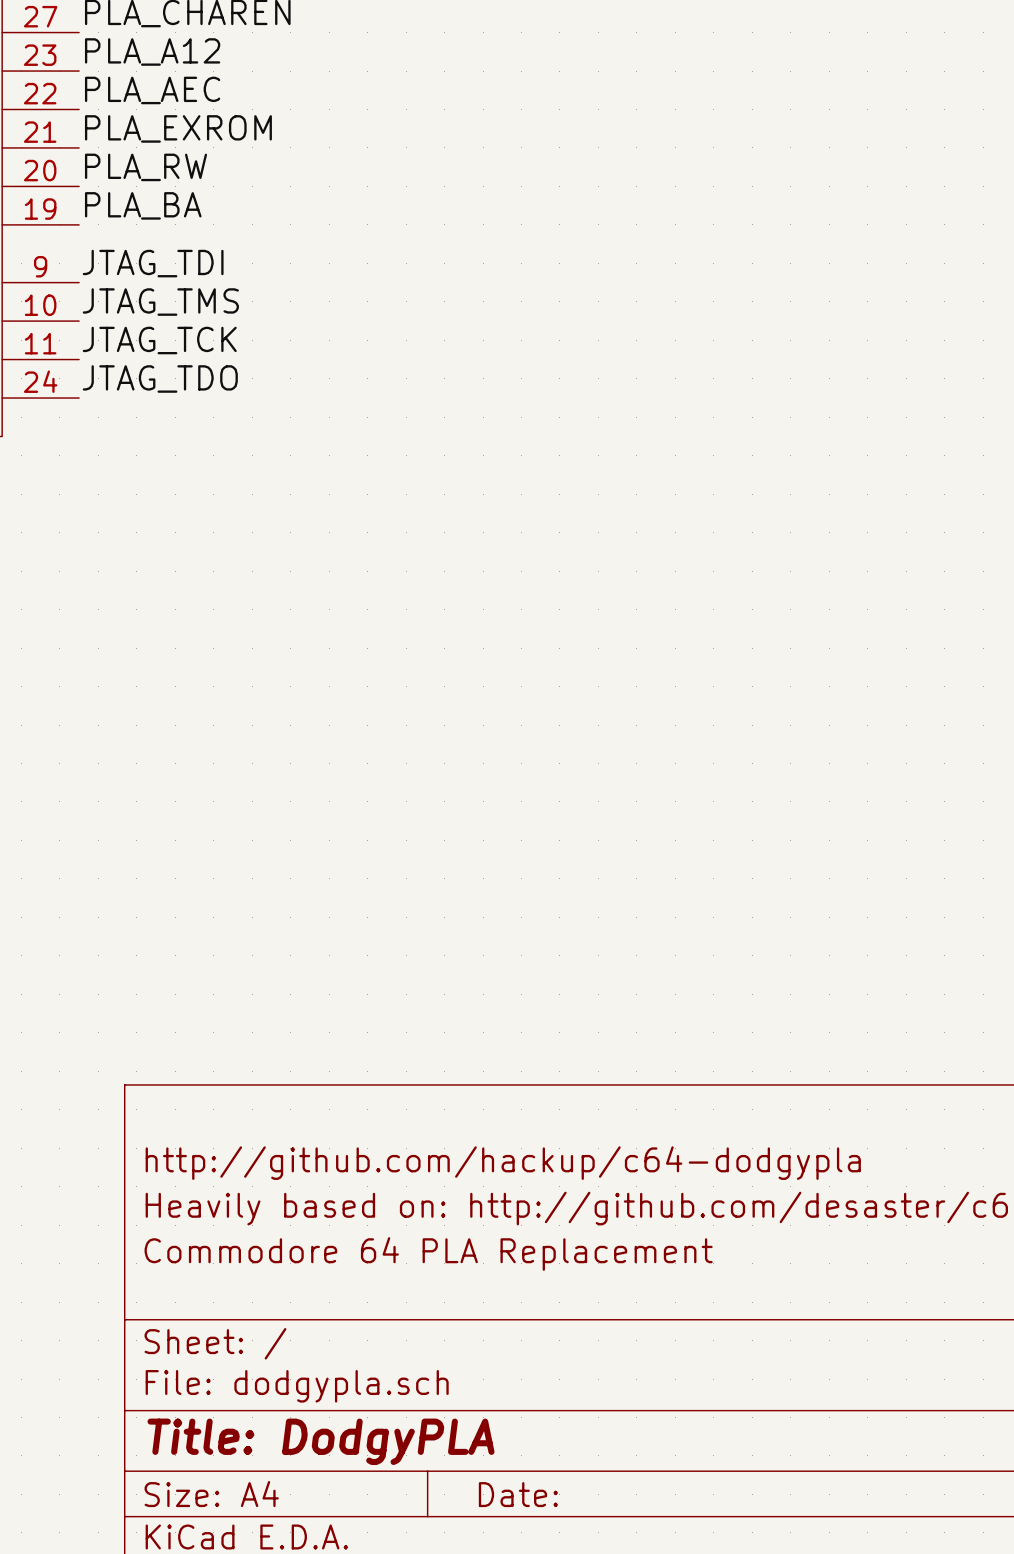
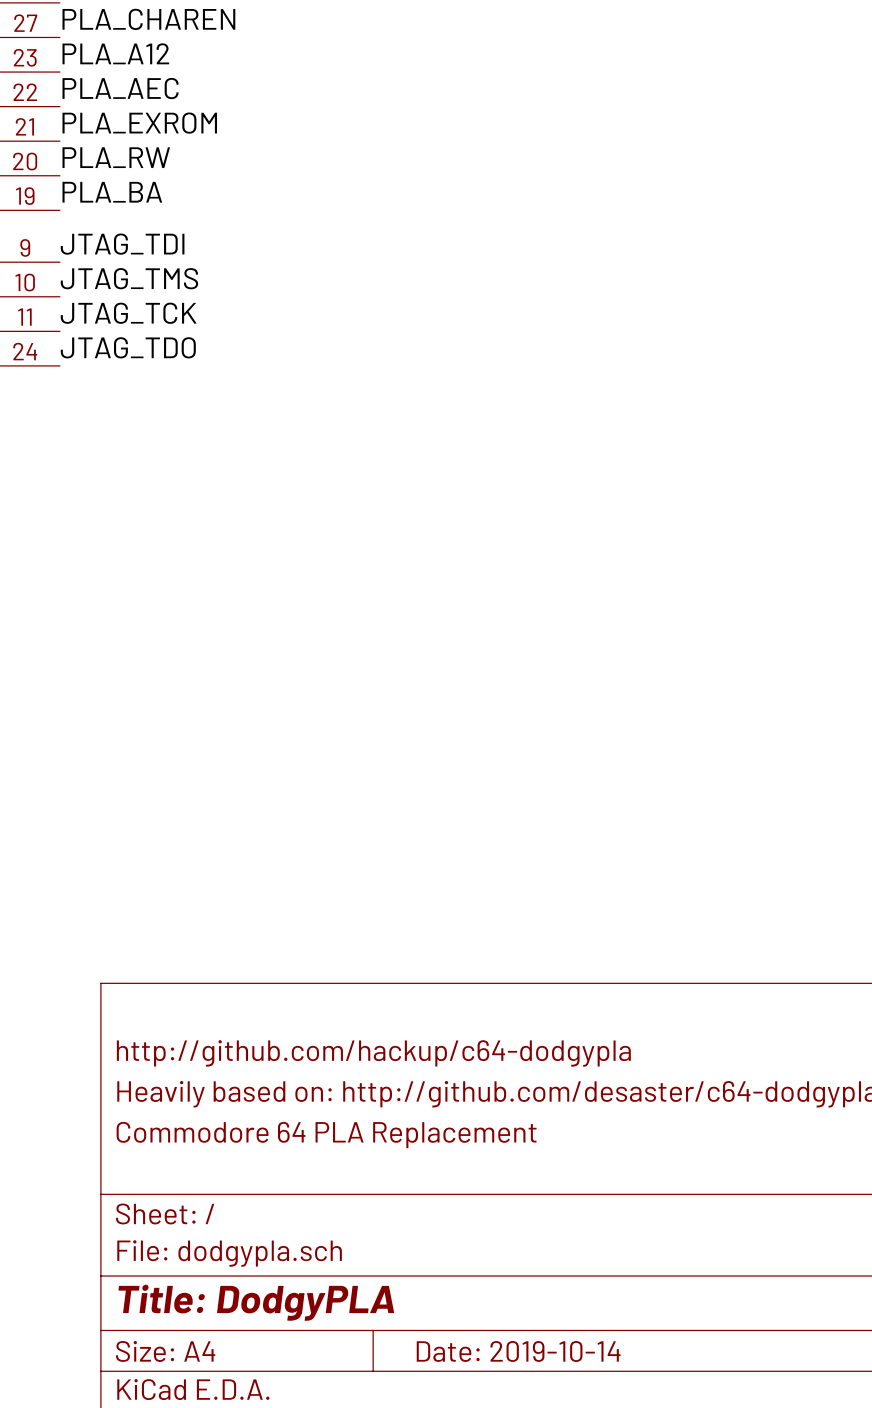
title block: Date: (518, 1494) -> Date: 2019-10-14 (518, 1351)

